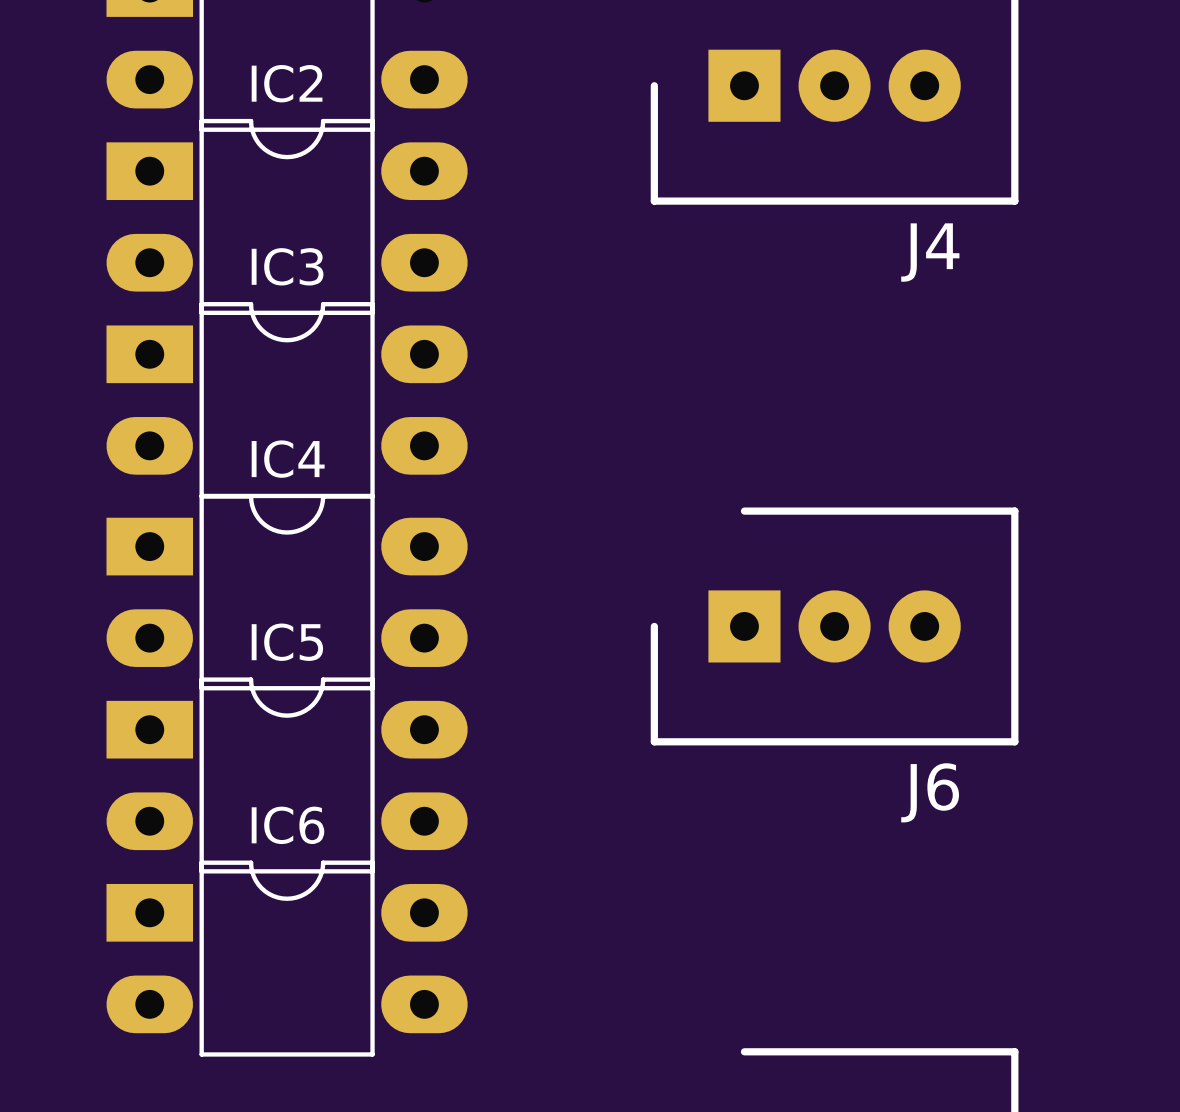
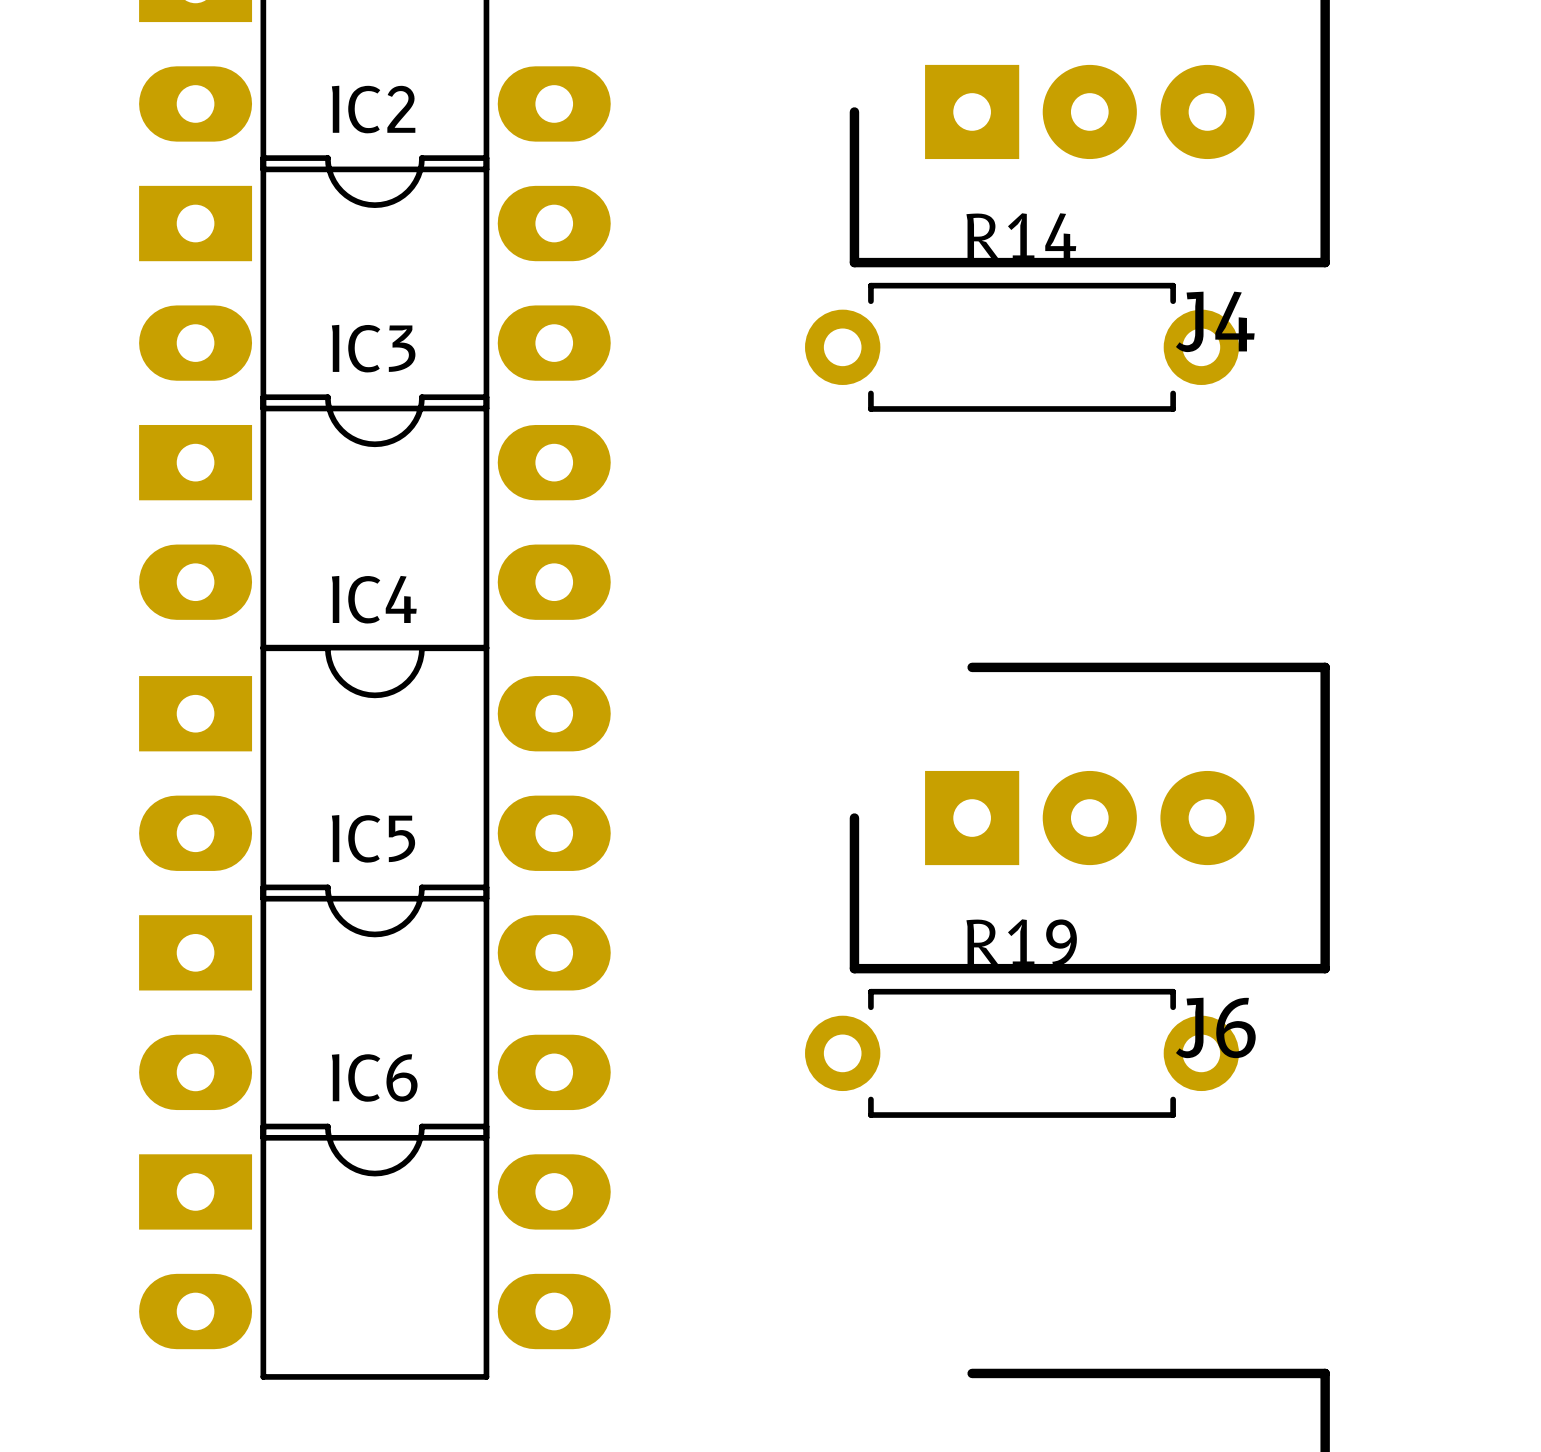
R14: none -> (1022, 347)
R19: none -> (1022, 1053)

